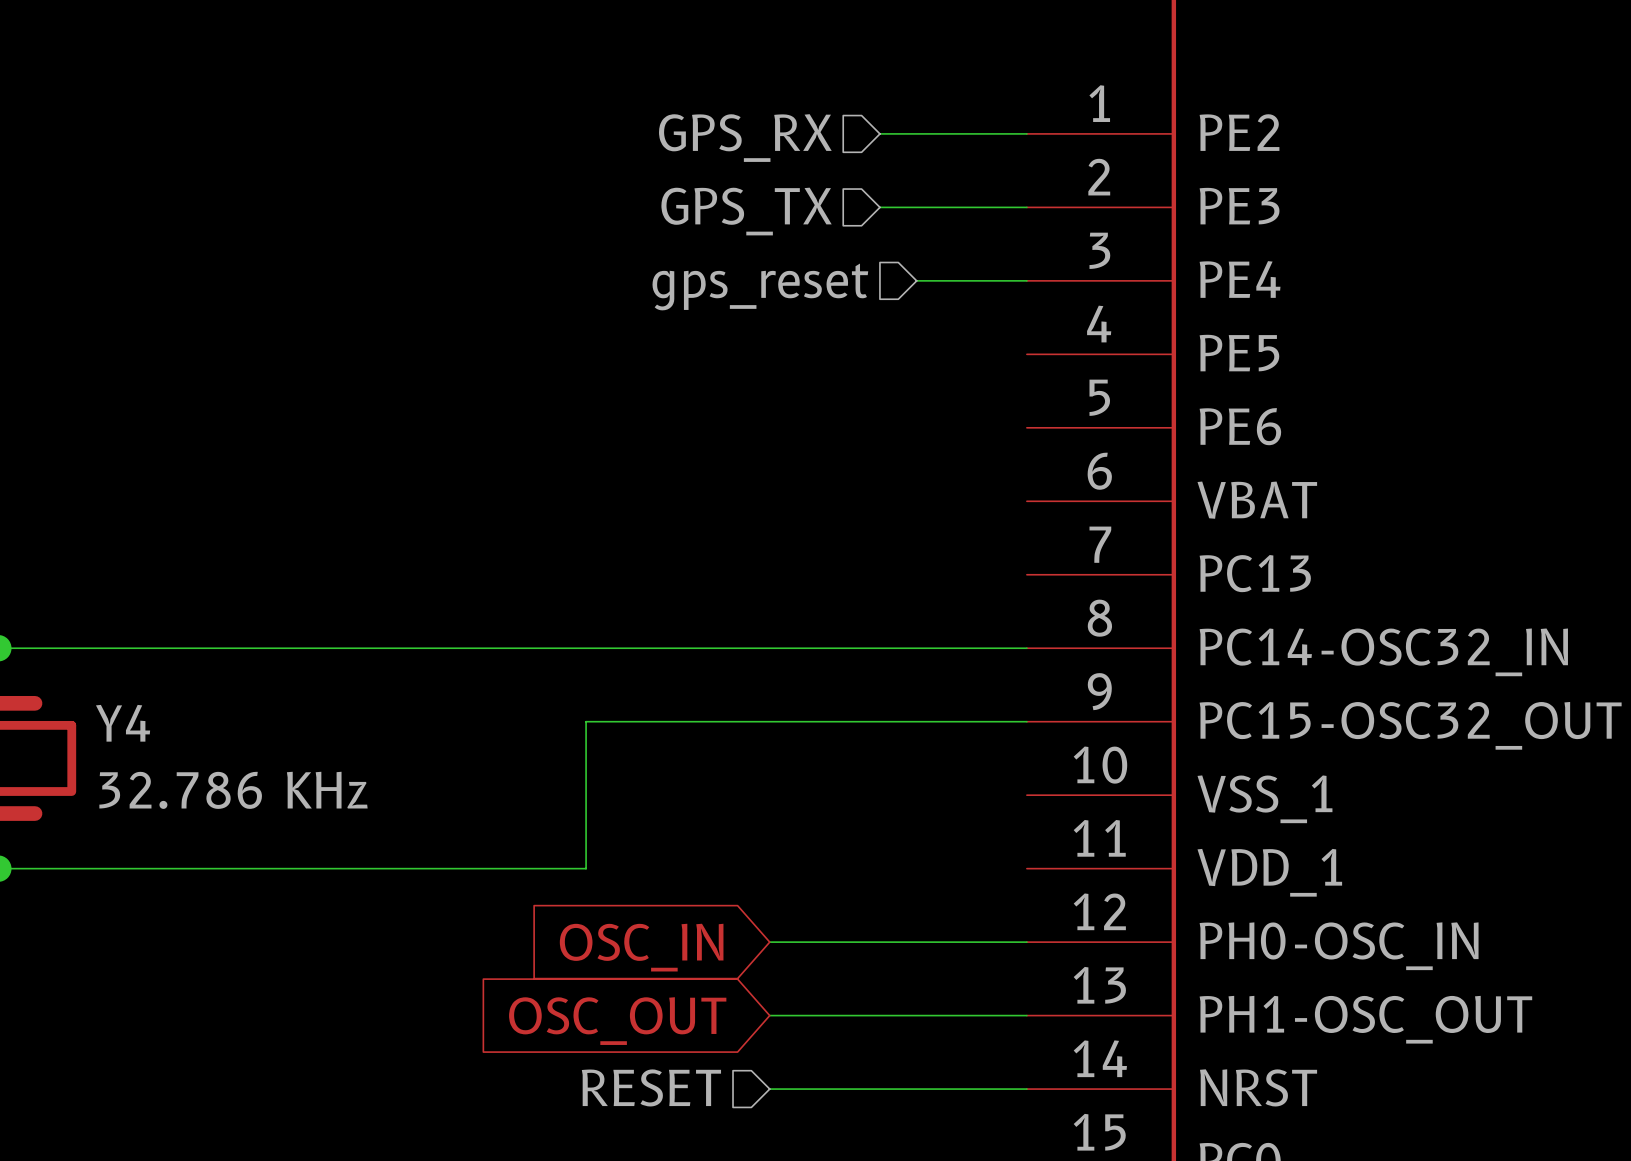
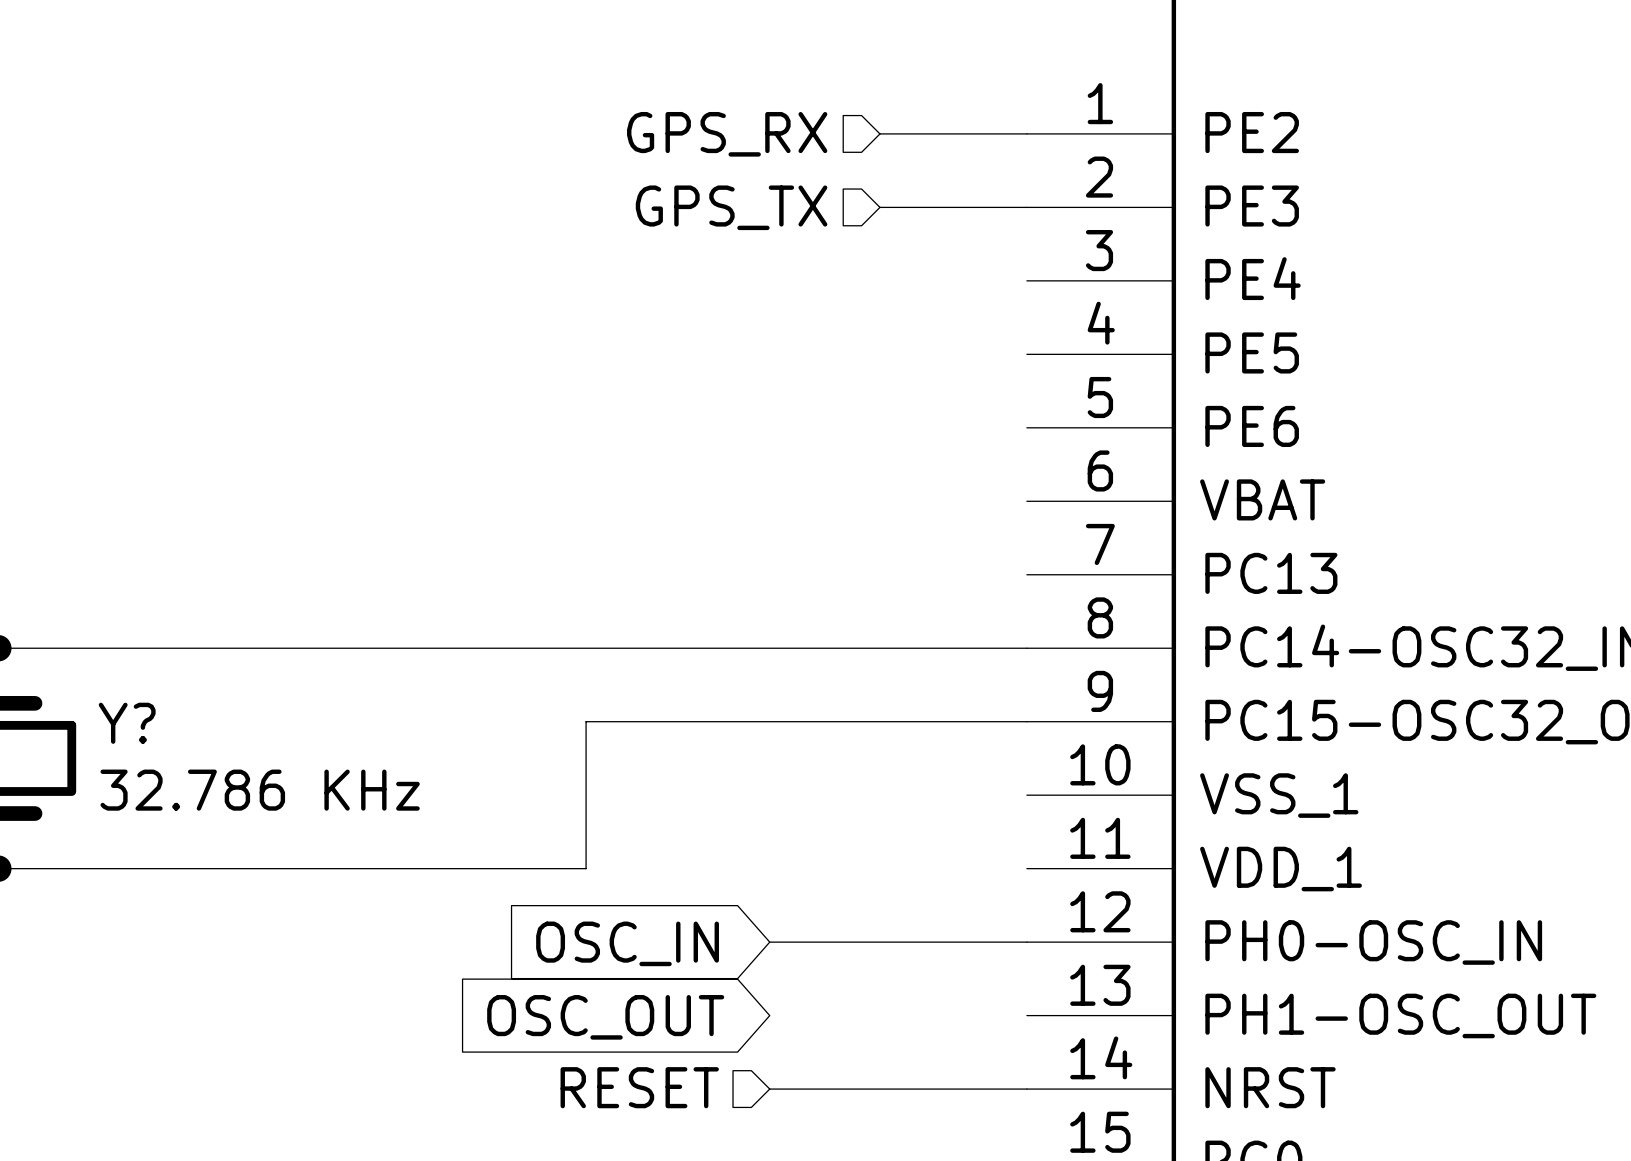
wire: (916, 280) (1026, 280) -> none
hierarchical label: gps_reset (760, 286) -> none
Y4 name: Y4 (123, 723) -> Y? (127, 723)
wire: (769, 1015) (1026, 1015) -> none

